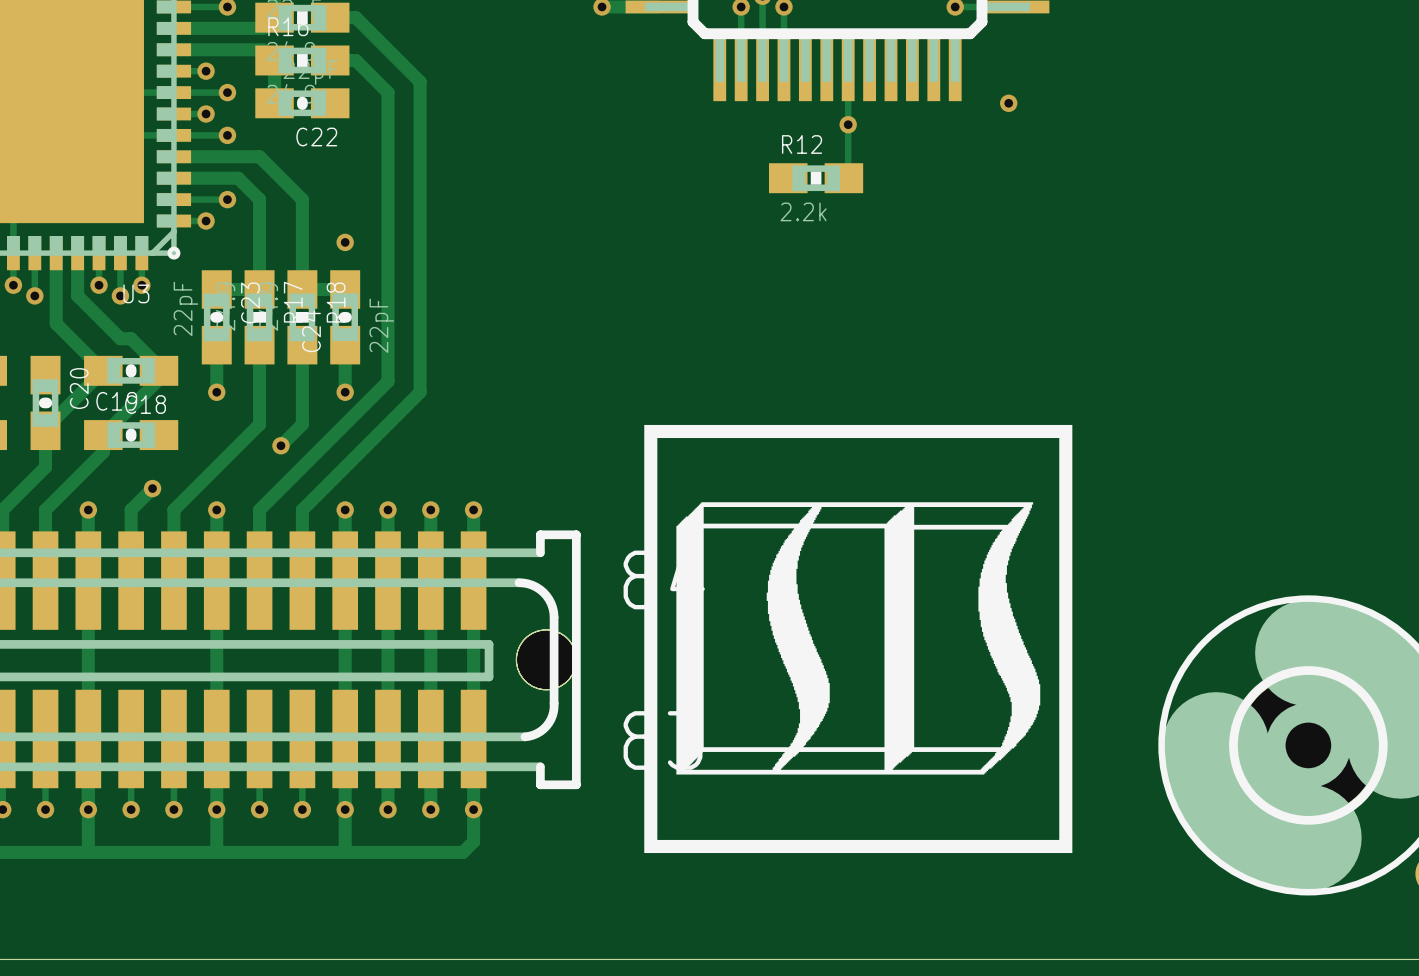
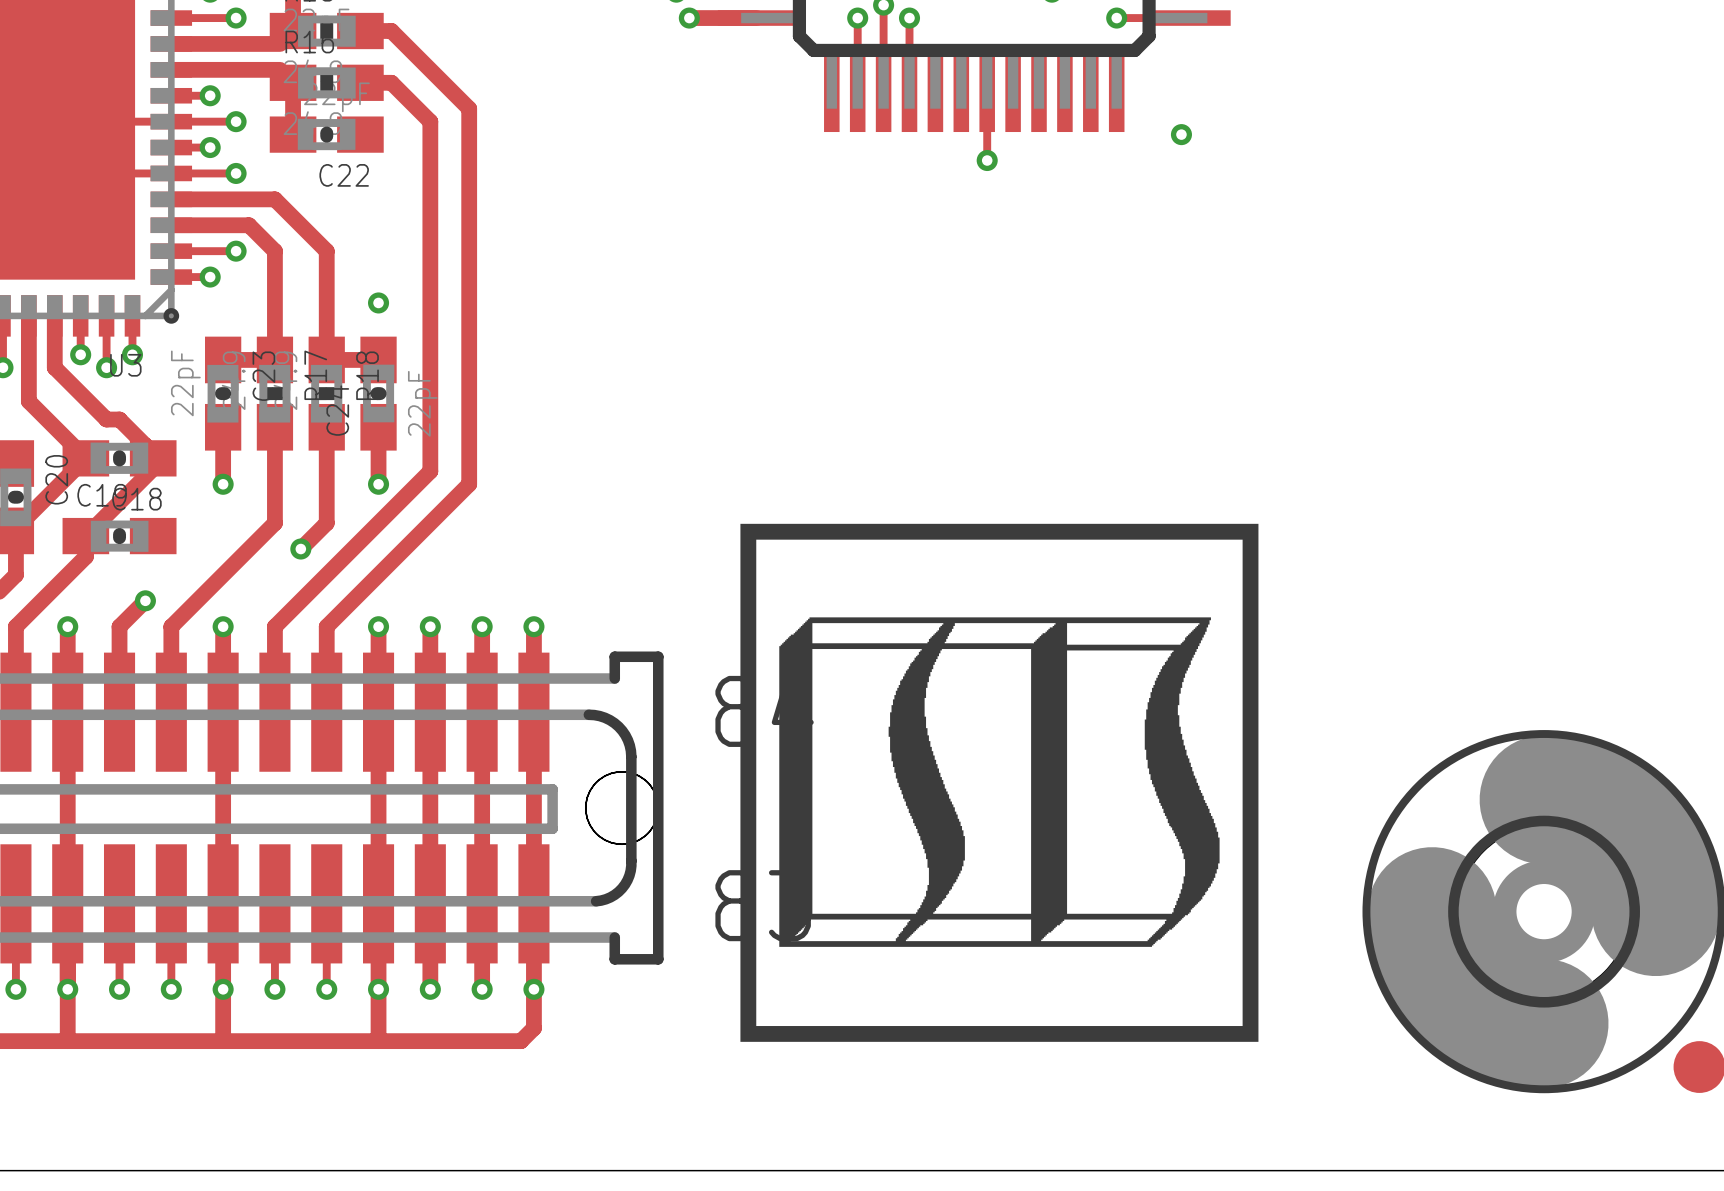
track: (848, 124) (848, 178) (843, 178) -> none
R12: 2.2k (816, 178) -> none

